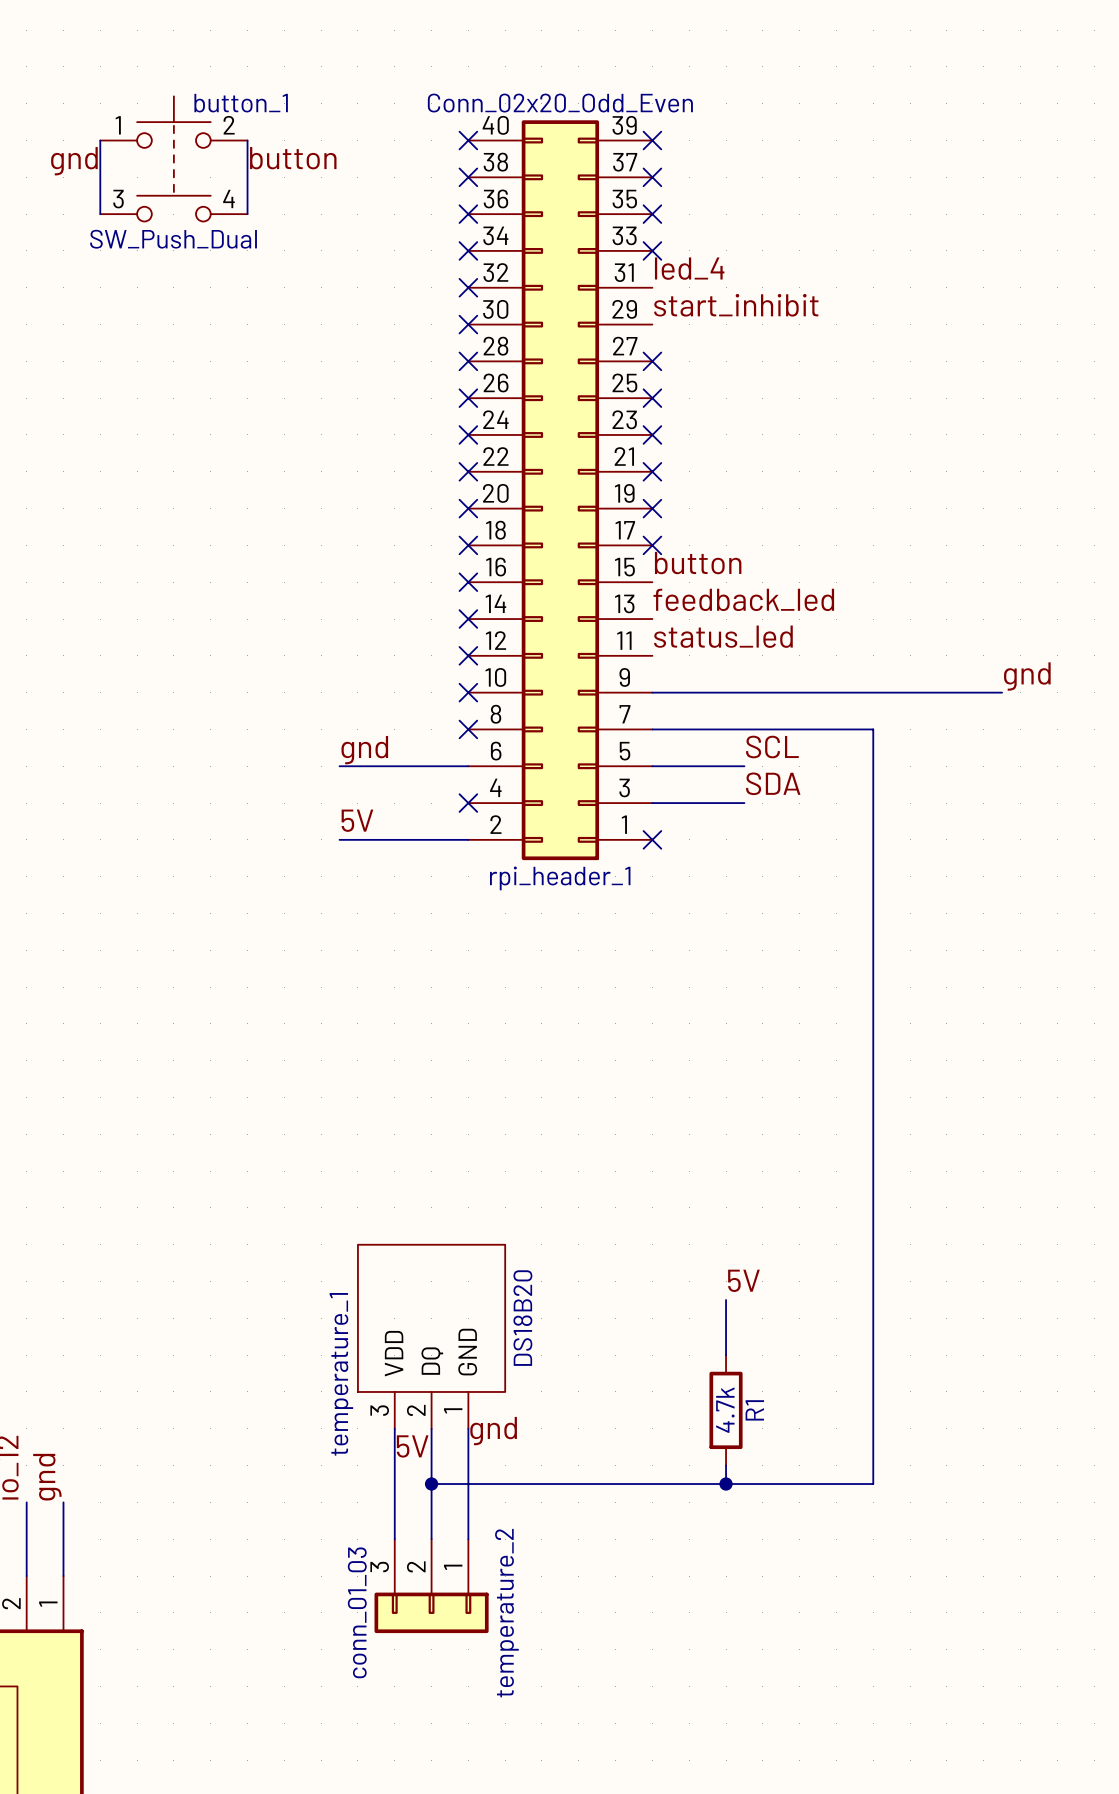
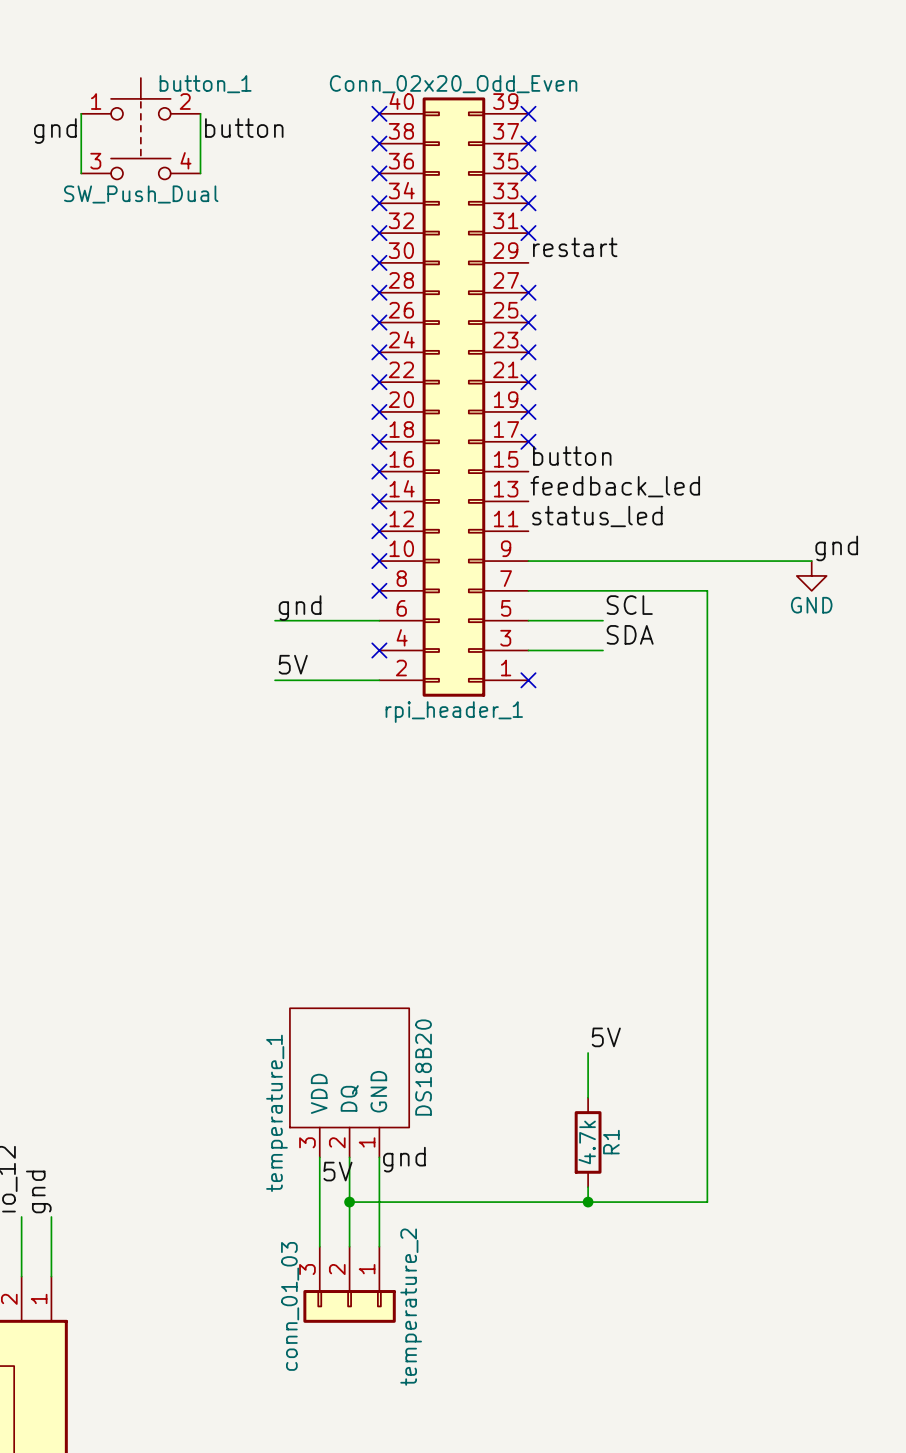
label: led_4 (689, 268) -> none
no-connect mark: none -> (528, 233)
label: start_inhibit (736, 305) -> restart (575, 247)
power symbol: none -> GND (811, 575)

